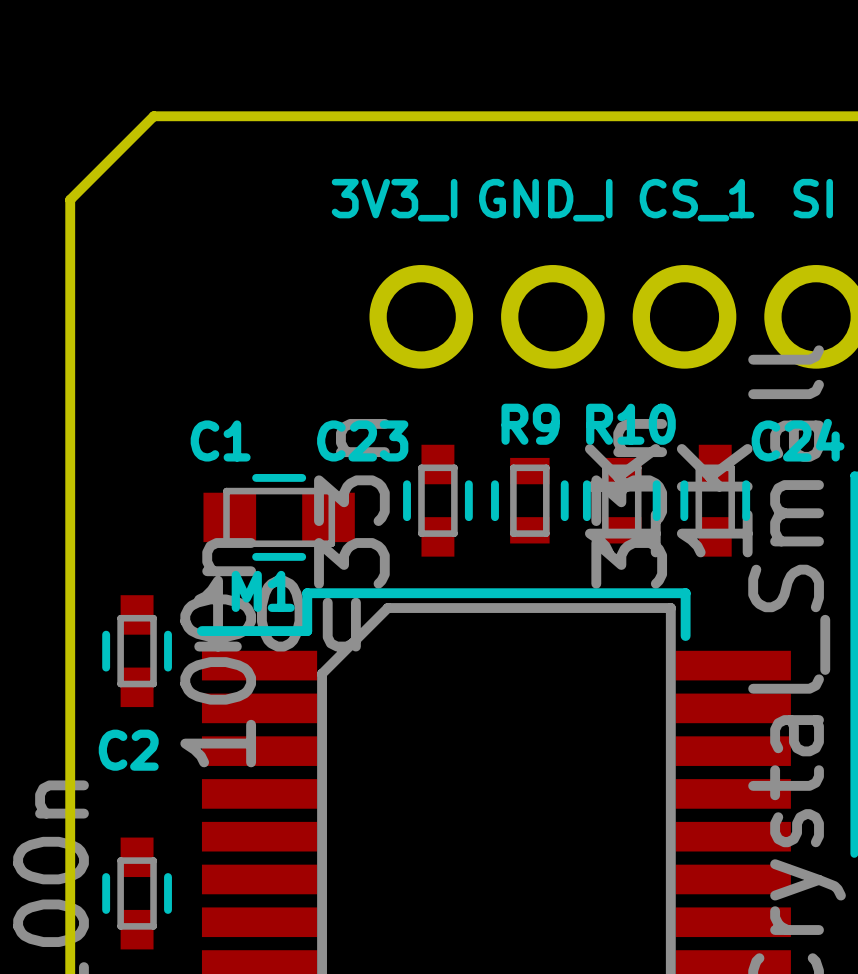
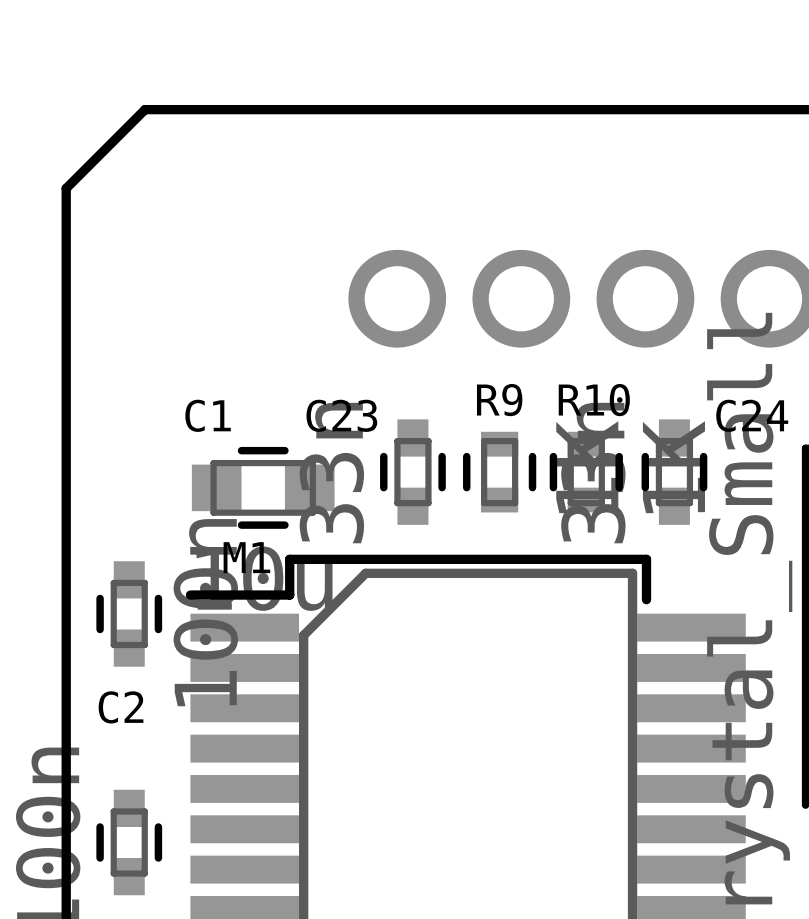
text: SI (813, 198) -> none
text: 3V3_I (394, 200) -> none
text: GND_I (545, 200) -> none
text: CS_1 (697, 200) -> none

